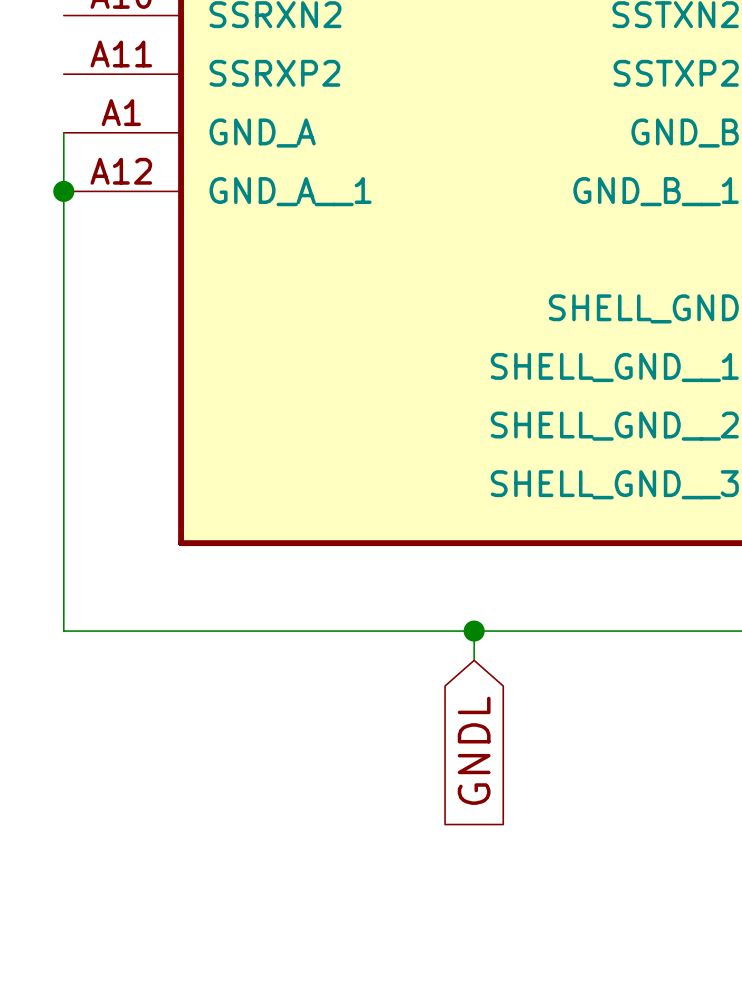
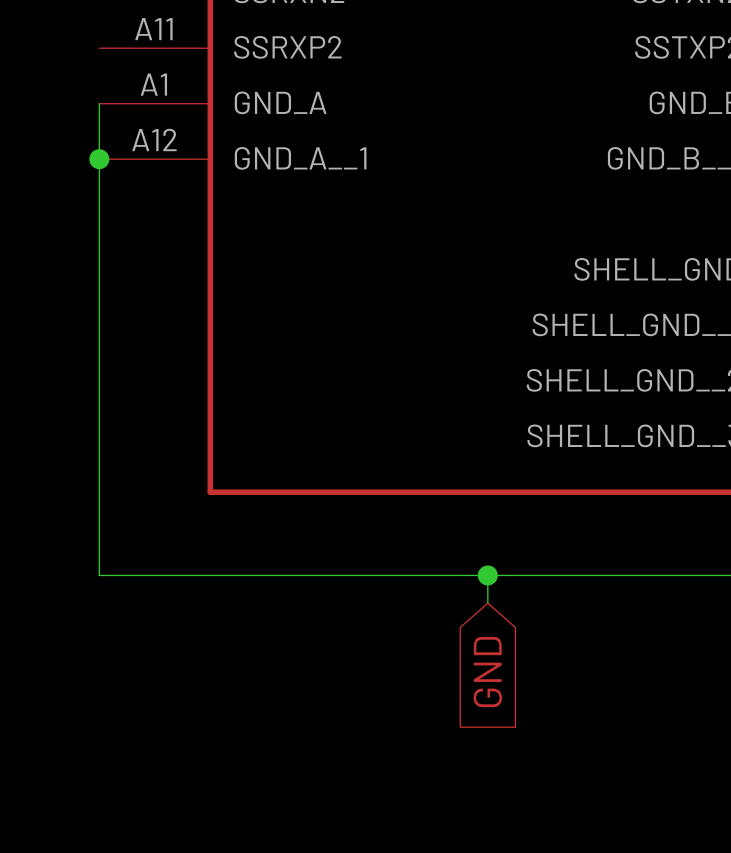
global label: GNDL (474, 750) -> GND (487, 672)

